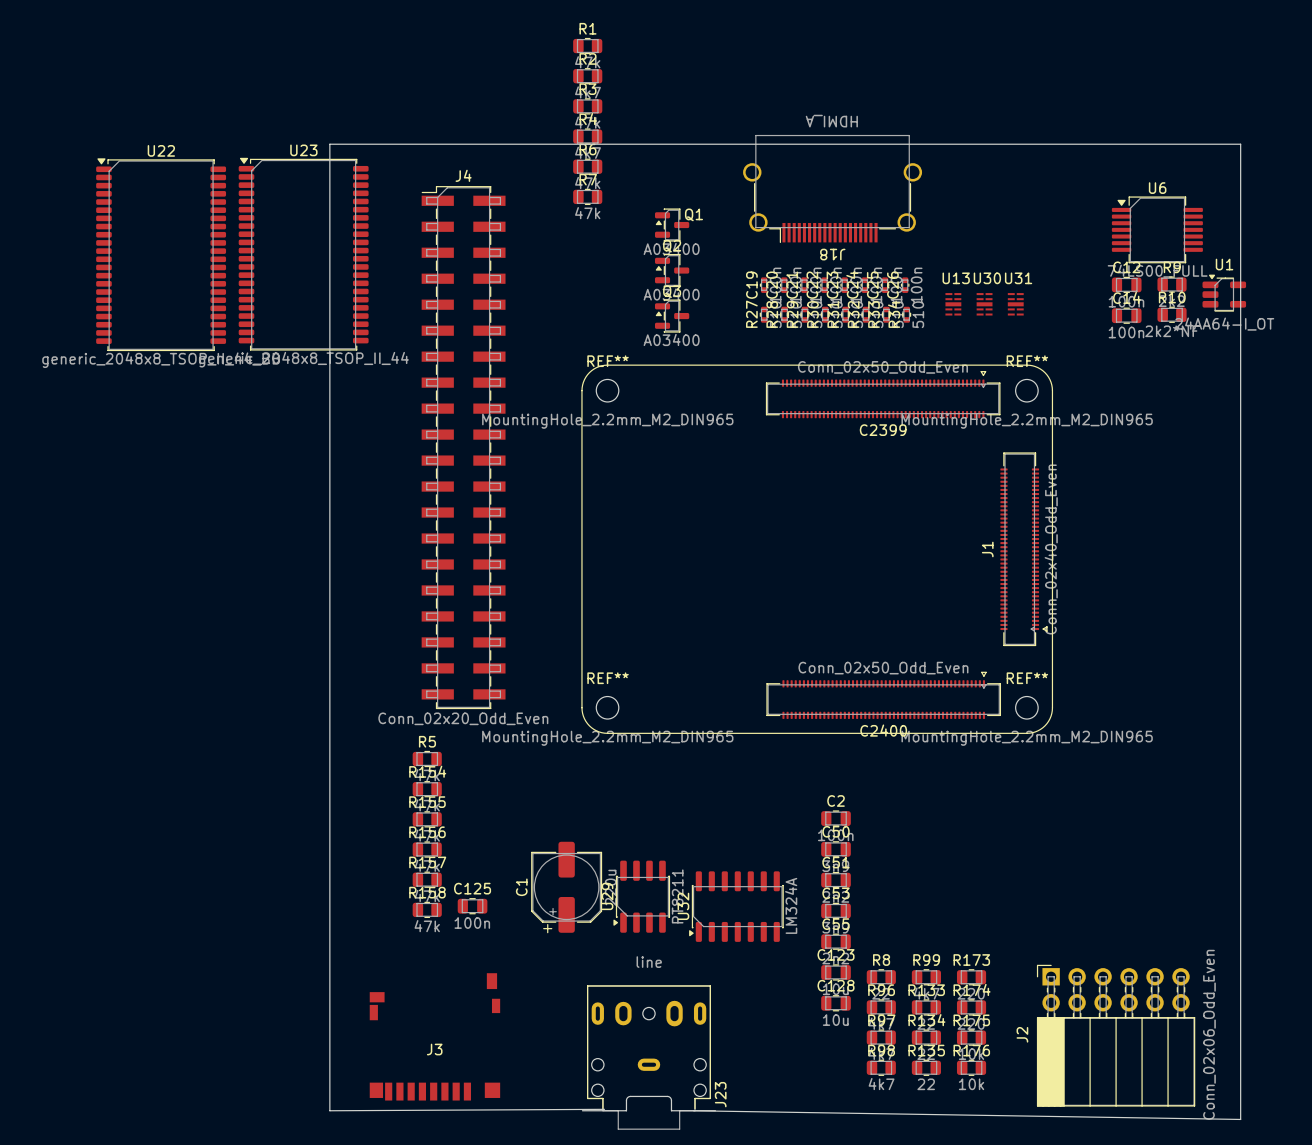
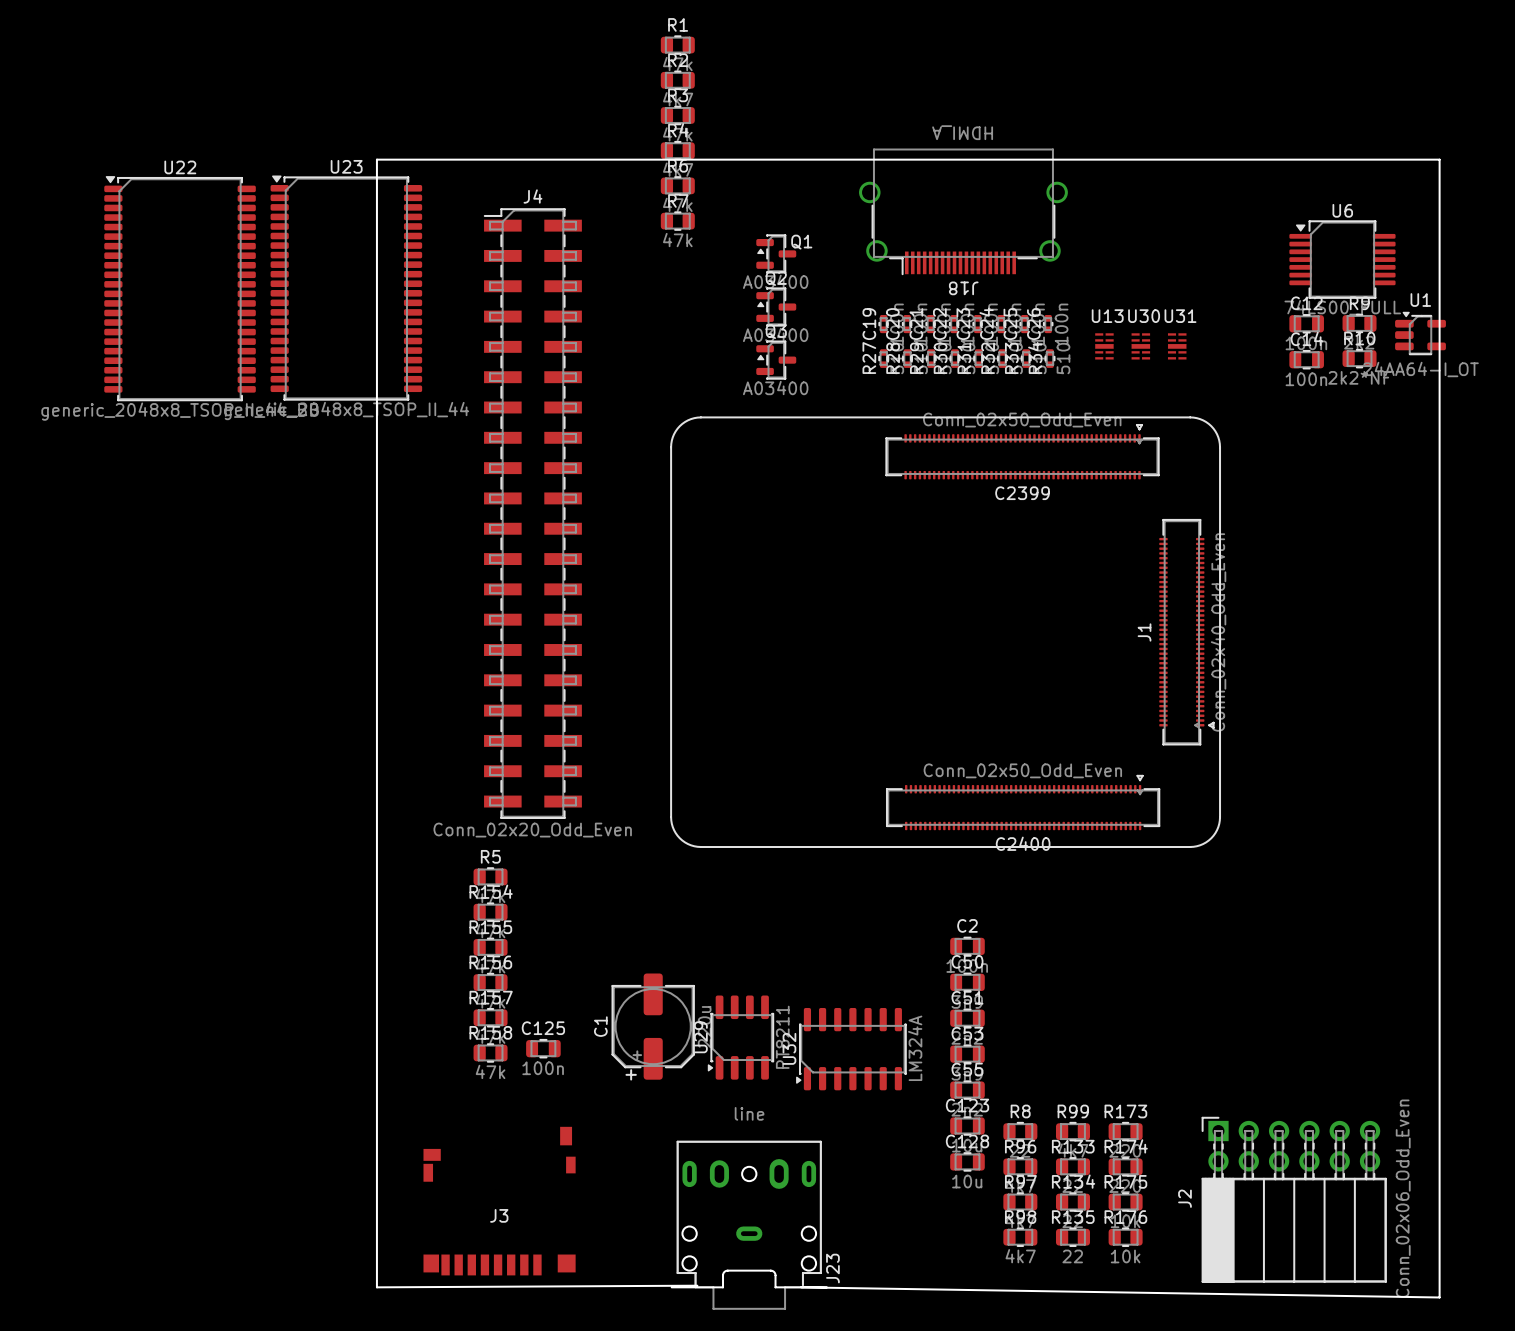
REF**: MountingHole_2.2mm_M2_DIN965 (607, 390) -> none
REF**: MountingHole_2.2mm_M2_DIN965 (1026, 390) -> none
REF**: MountingHole_2.2mm_M2_DIN965 (607, 707) -> none
REF**: MountingHole_2.2mm_M2_DIN965 (1026, 707) -> none

